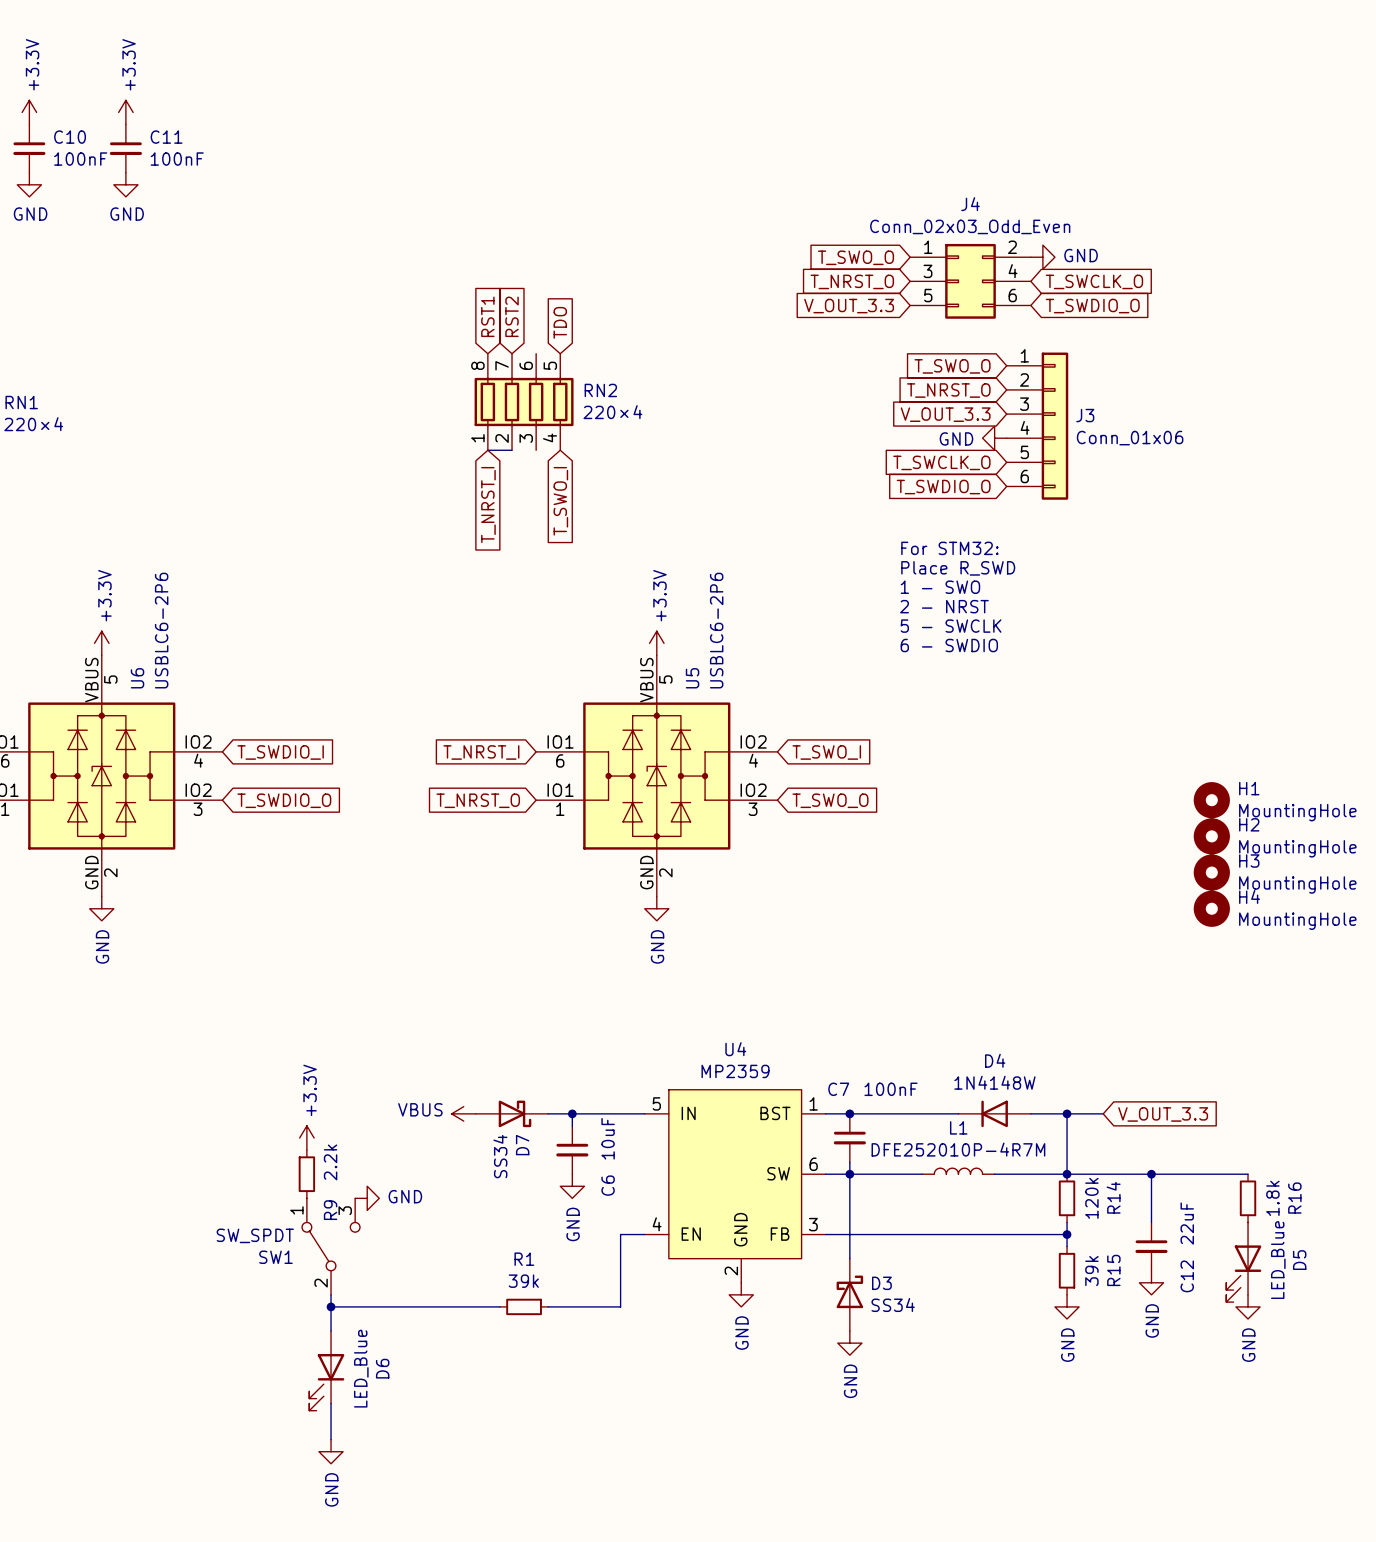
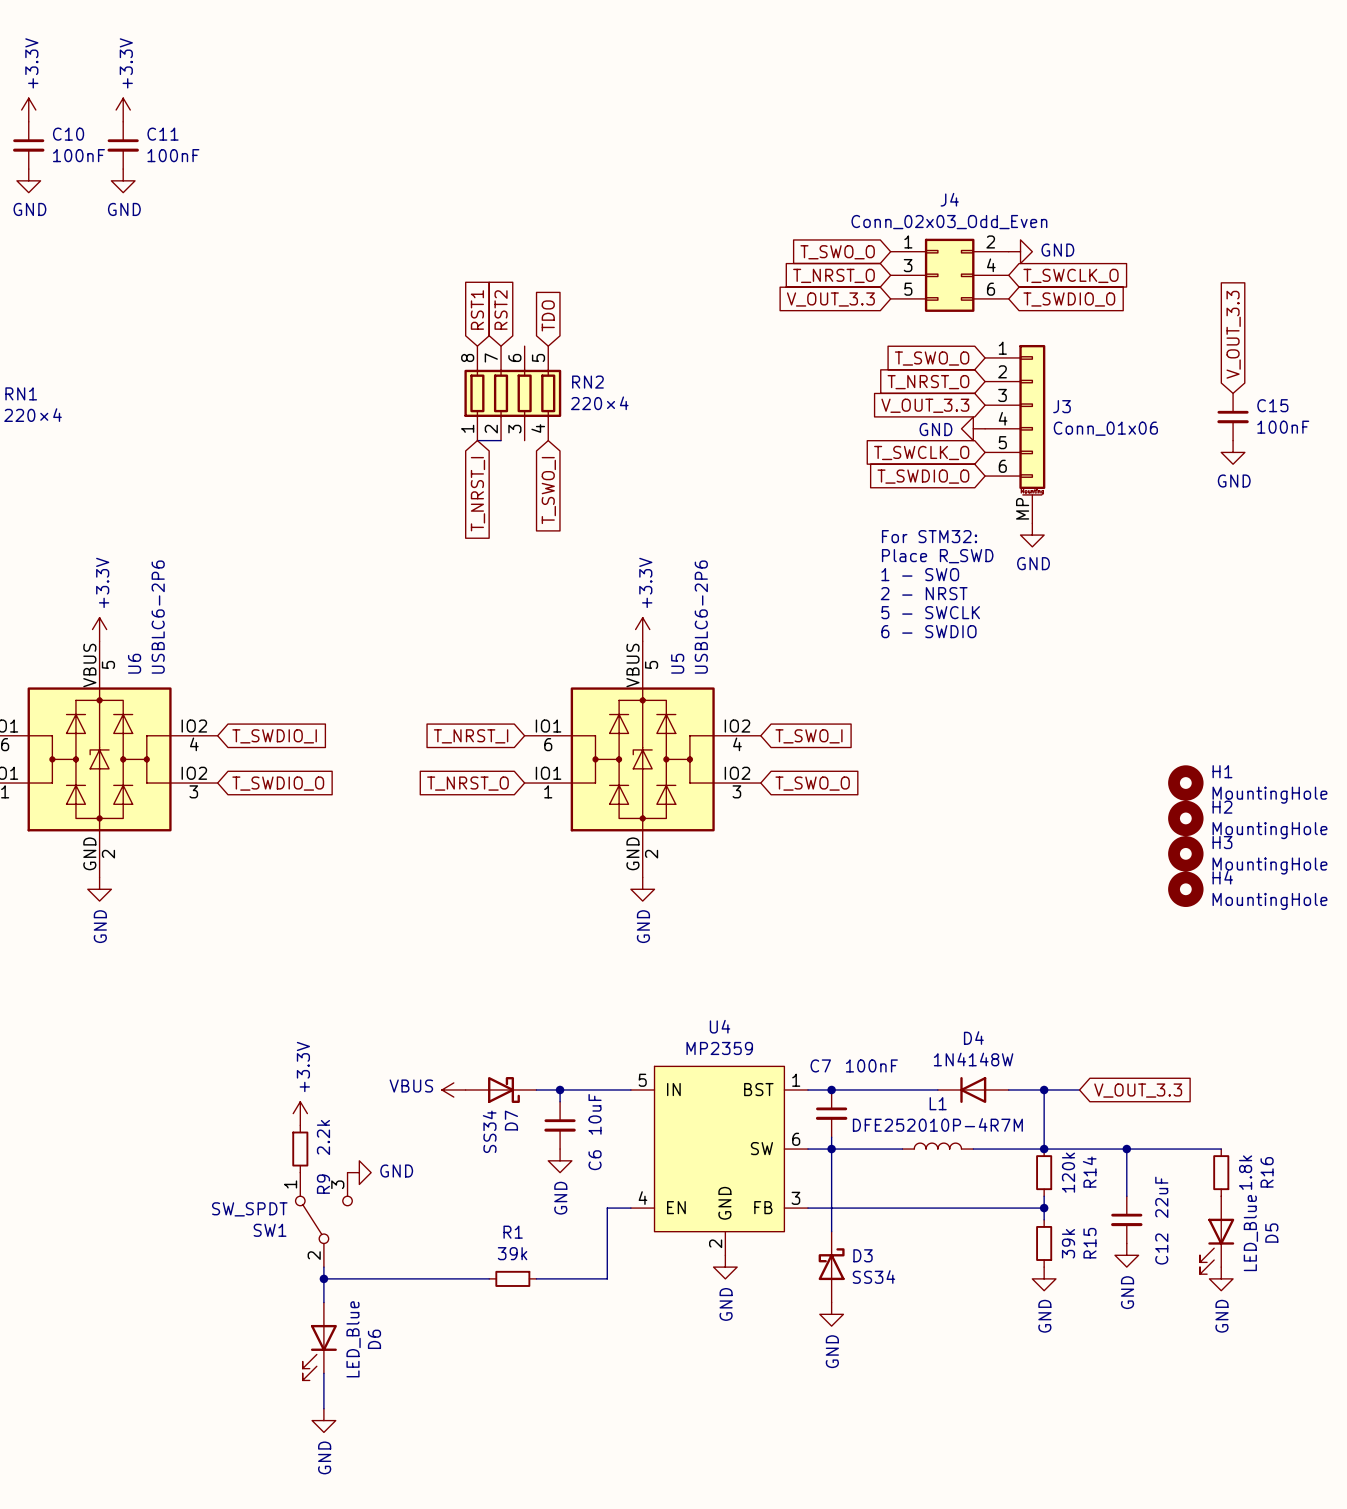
global label: none -> V_OUT_3.3 (1233, 334)
J3 symbol: [1006, 352, 1069, 500] -> [985, 344, 1046, 524]
C15: none -> 100nF (1233, 417)
power symbol: none -> GND (1233, 452)
power symbol: none -> GND (1032, 535)

